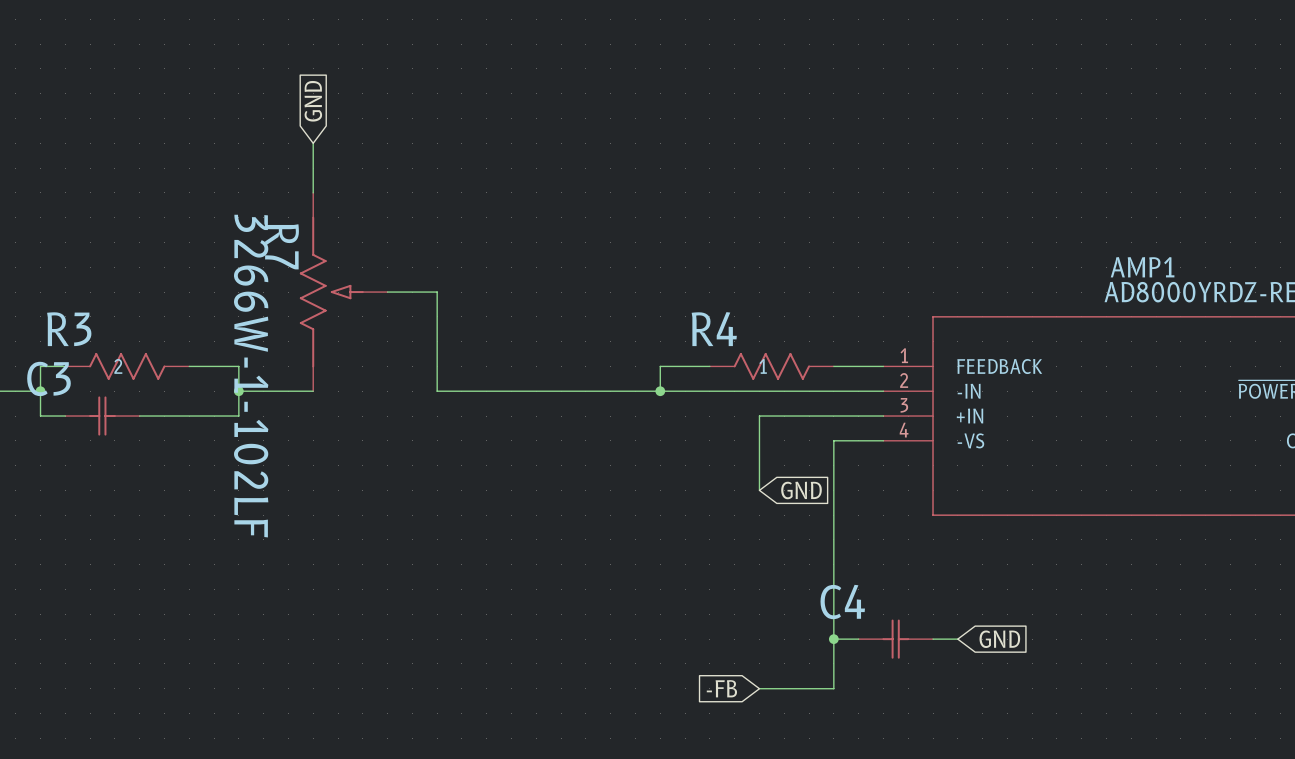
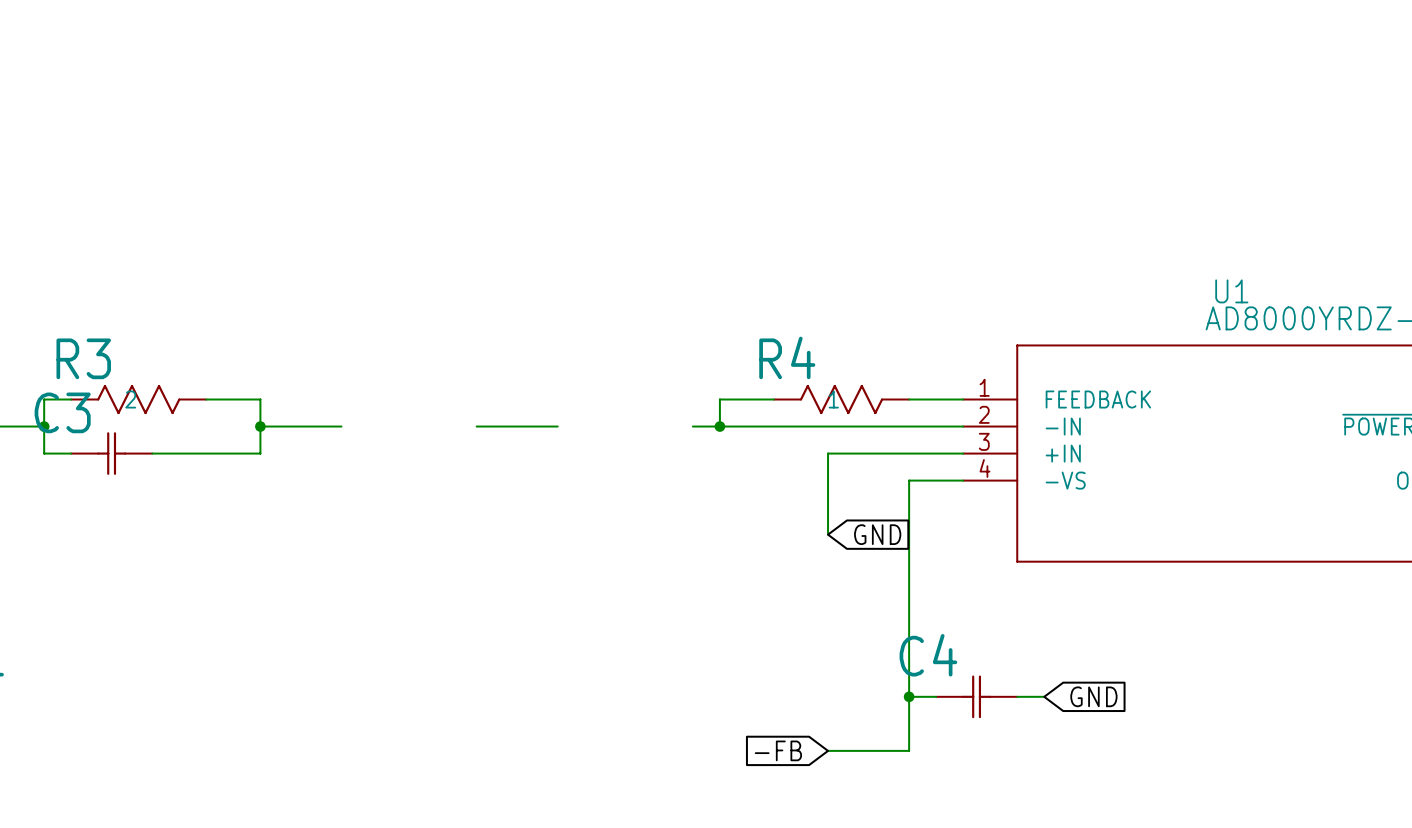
global label: GND (313, 101) -> none
wire: (313, 143) (313, 192) -> none
AMP1 name: AMP1 (1142, 267) -> U1 (1231, 291)
R7: 3266W-1-102LF (343, 292) -> none
wire: (387, 292) (437, 292) (437, 391) -> none
wire: (511, 391) (635, 391) -> none

